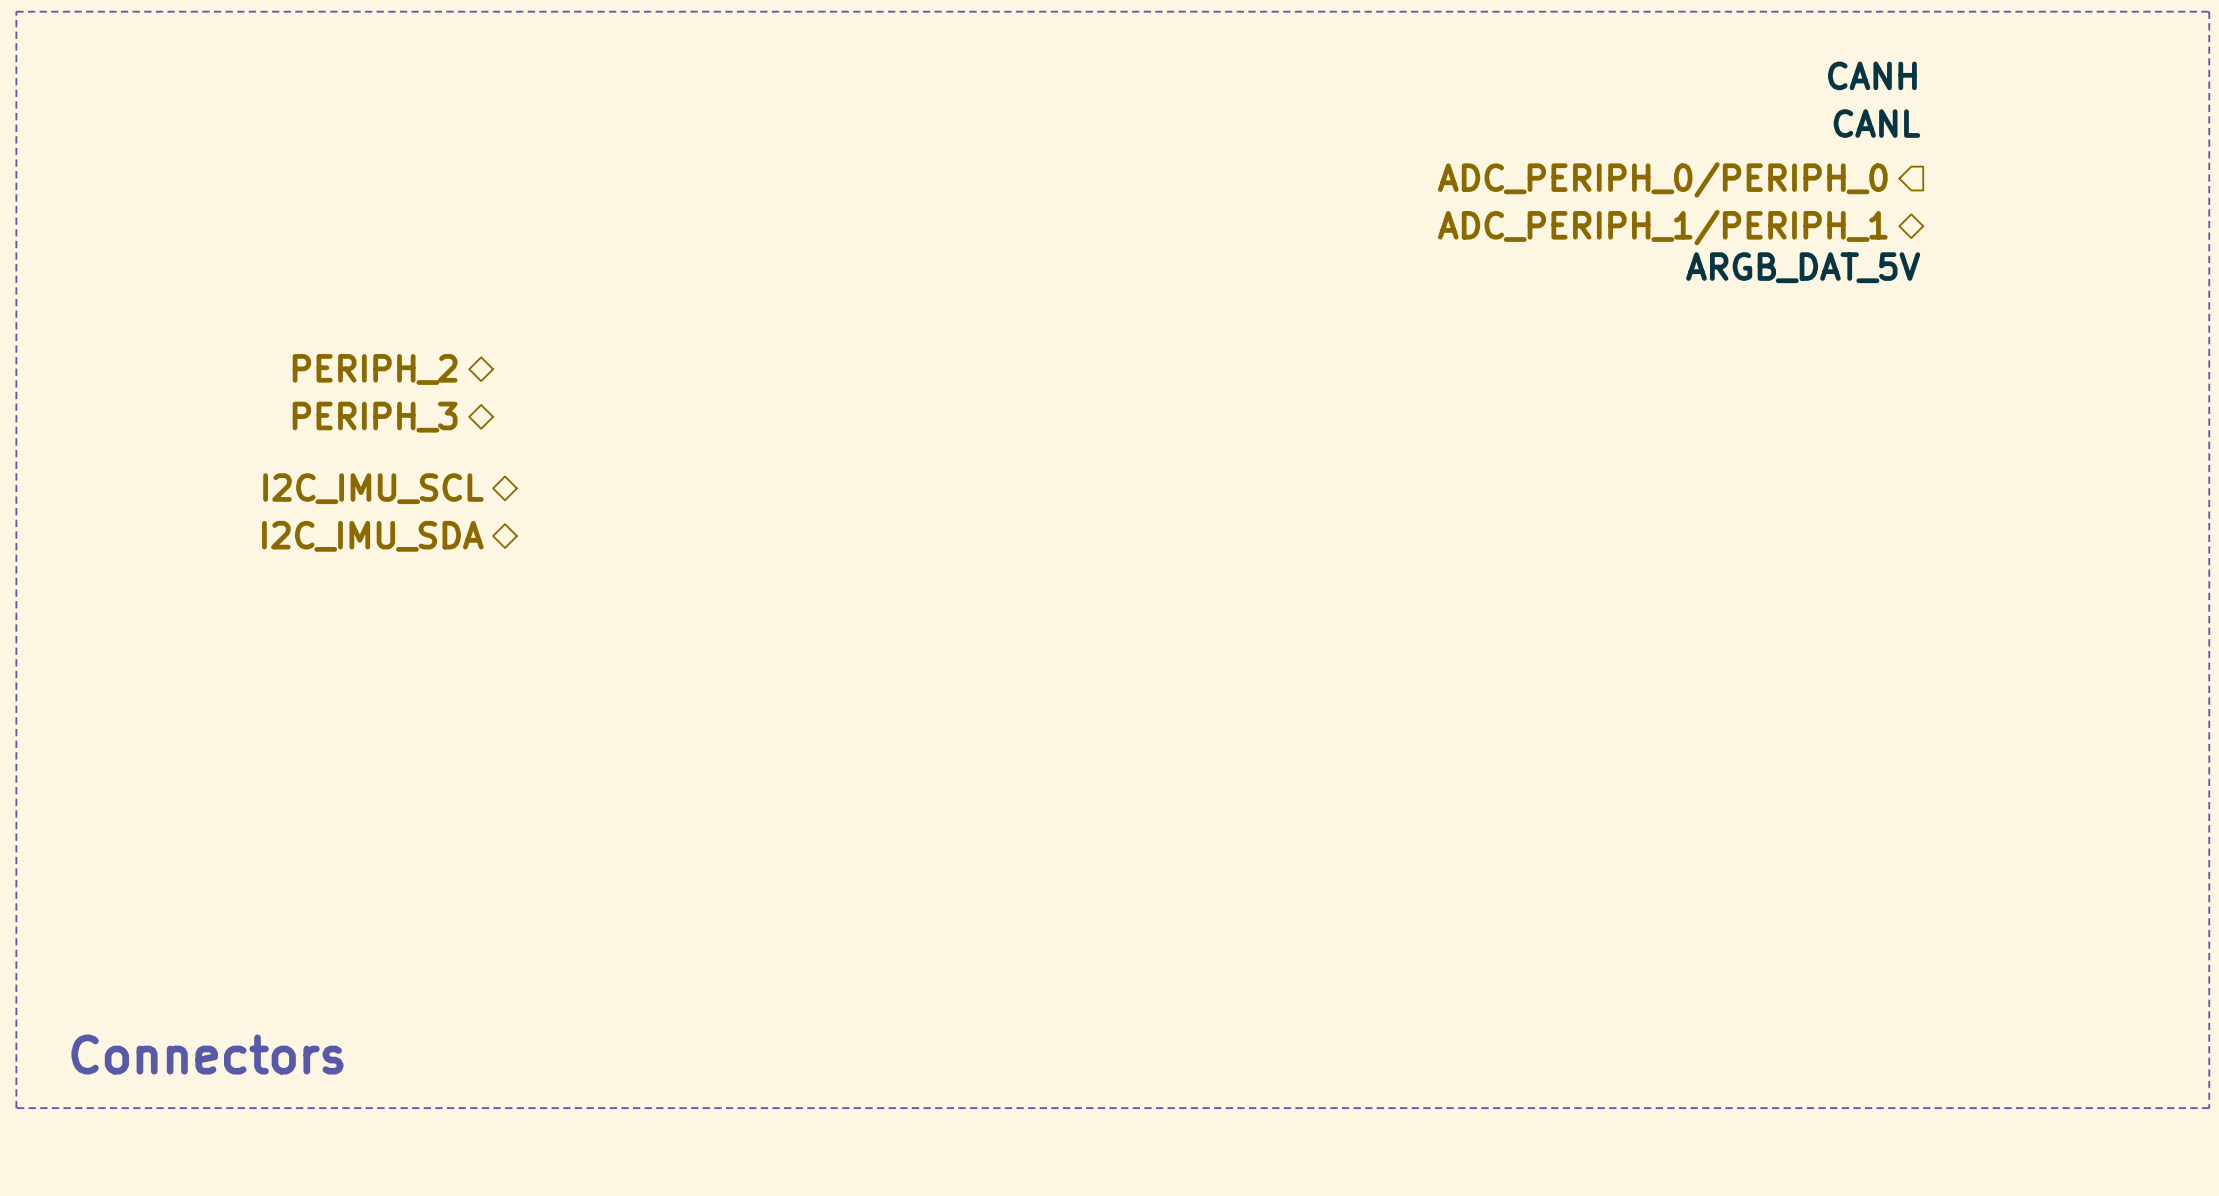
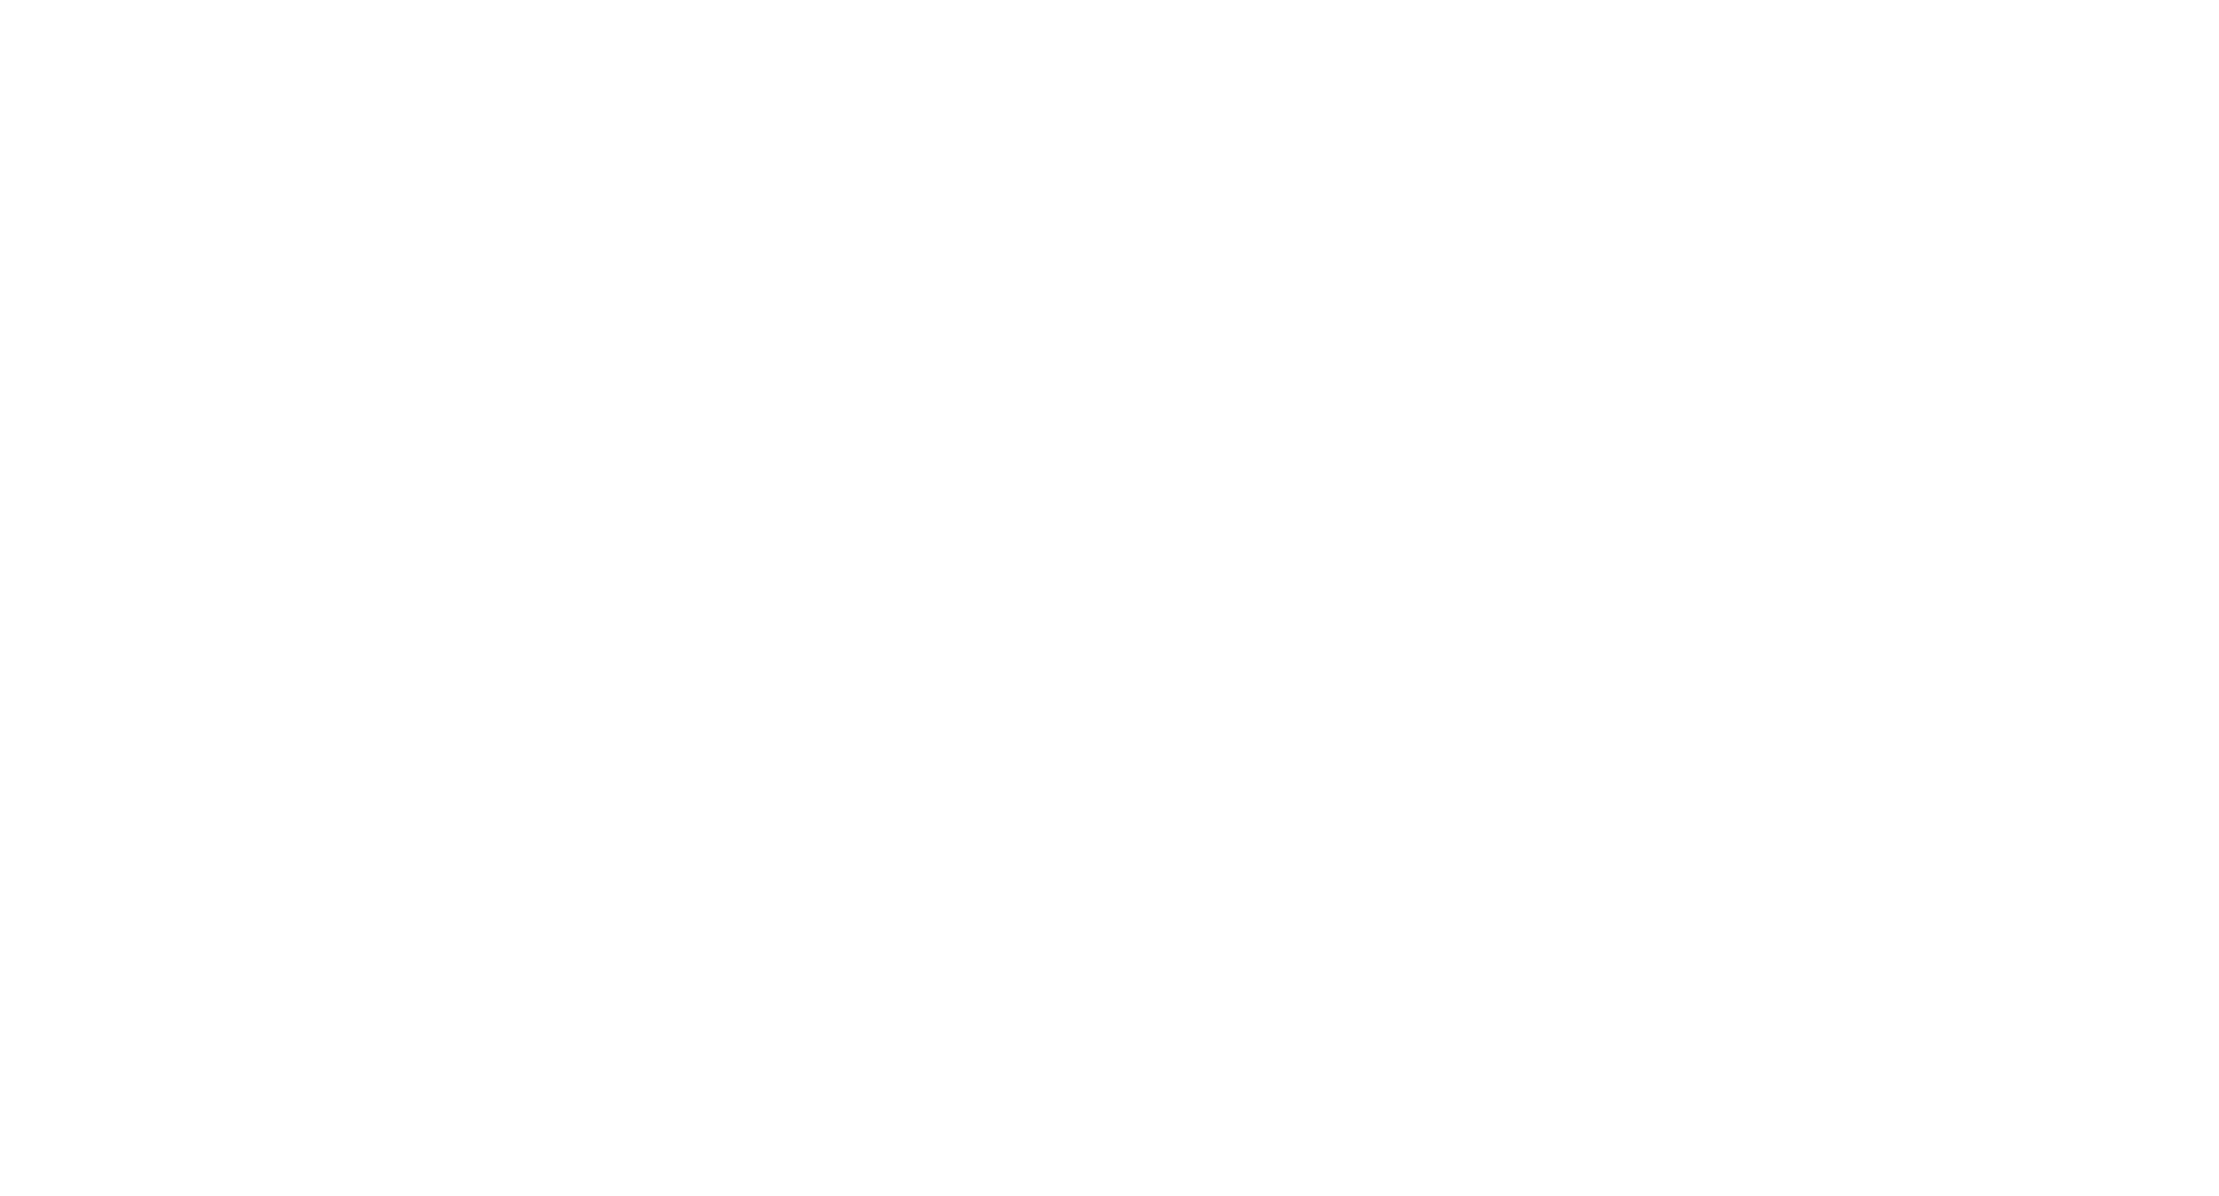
line: (16, 11) (2209, 11) (2209, 1108) (16, 1108) (16, 11) -> none
label: CANH (1872, 75) -> none
label: CANL (1876, 123) -> none
hierarchical label: ADC_PERIPH_0/PERIPH_0 (1662, 179) -> none
hierarchical label: ADC_PERIPH_1/PERIPH_1 (1662, 227) -> none
label: ARGB_DAT_5V (1803, 267) -> none
hierarchical label: PERIPH_2 (375, 369) -> none
hierarchical label: PERIPH_3 (375, 417) -> none
hierarchical label: I2C_IMU_SCL (373, 488) -> none
hierarchical label: I2C_IMU_SDA (372, 536) -> none
text: Connectors (207, 1054) -> none

